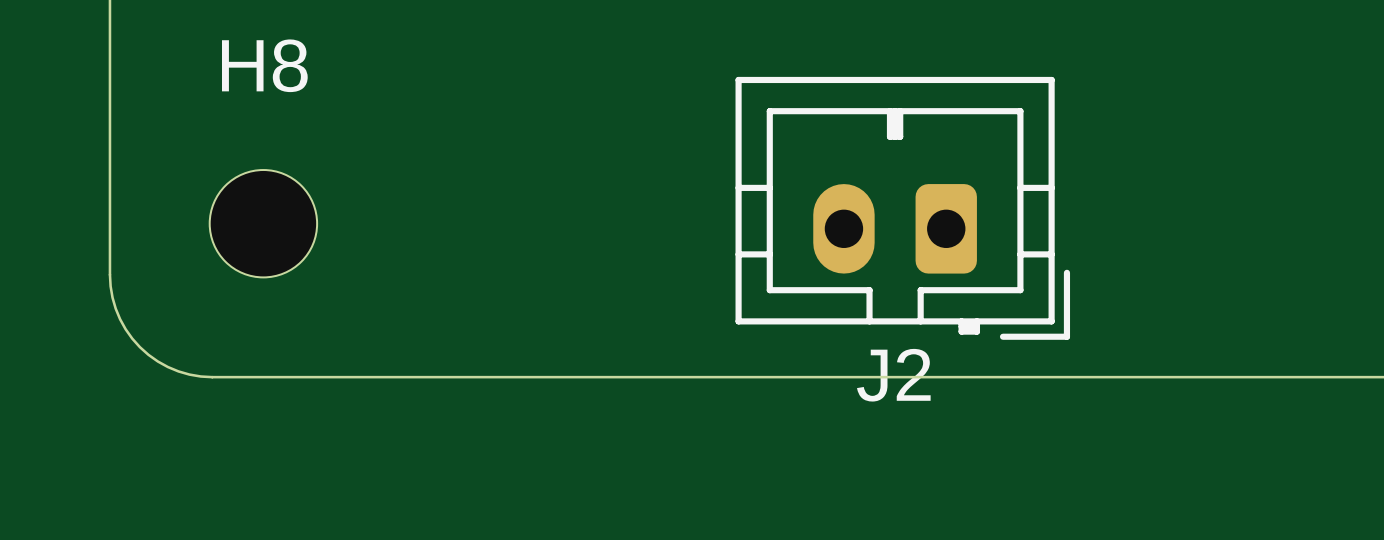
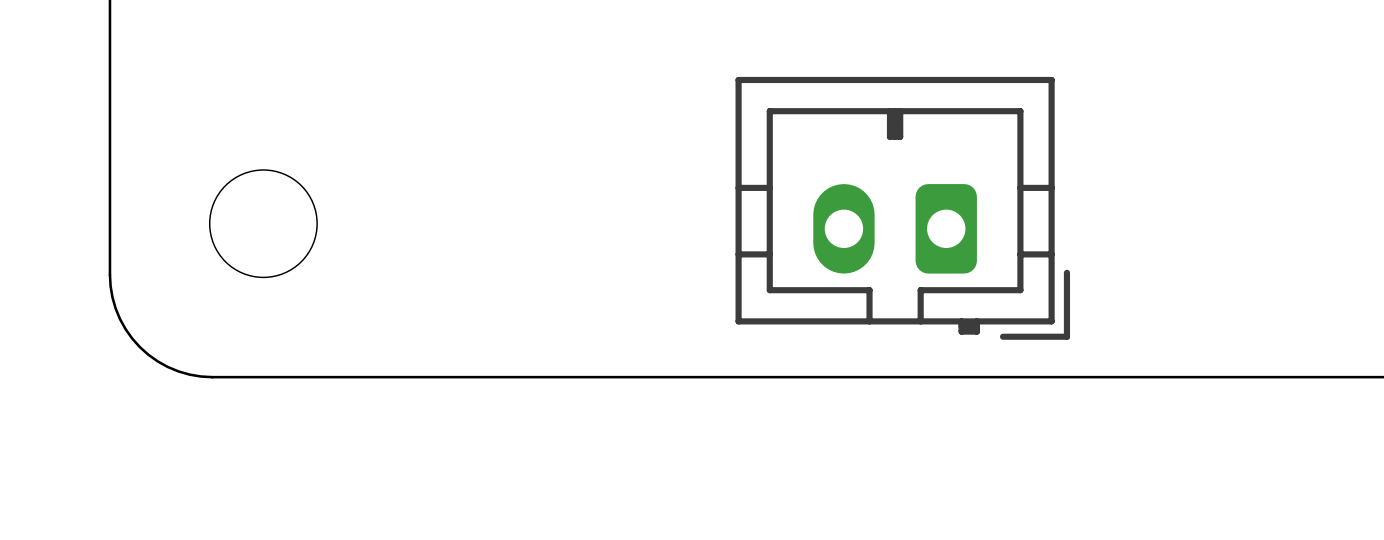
H8 name: H8 (264, 65) -> none
J2 name: J2 (893, 375) -> none

